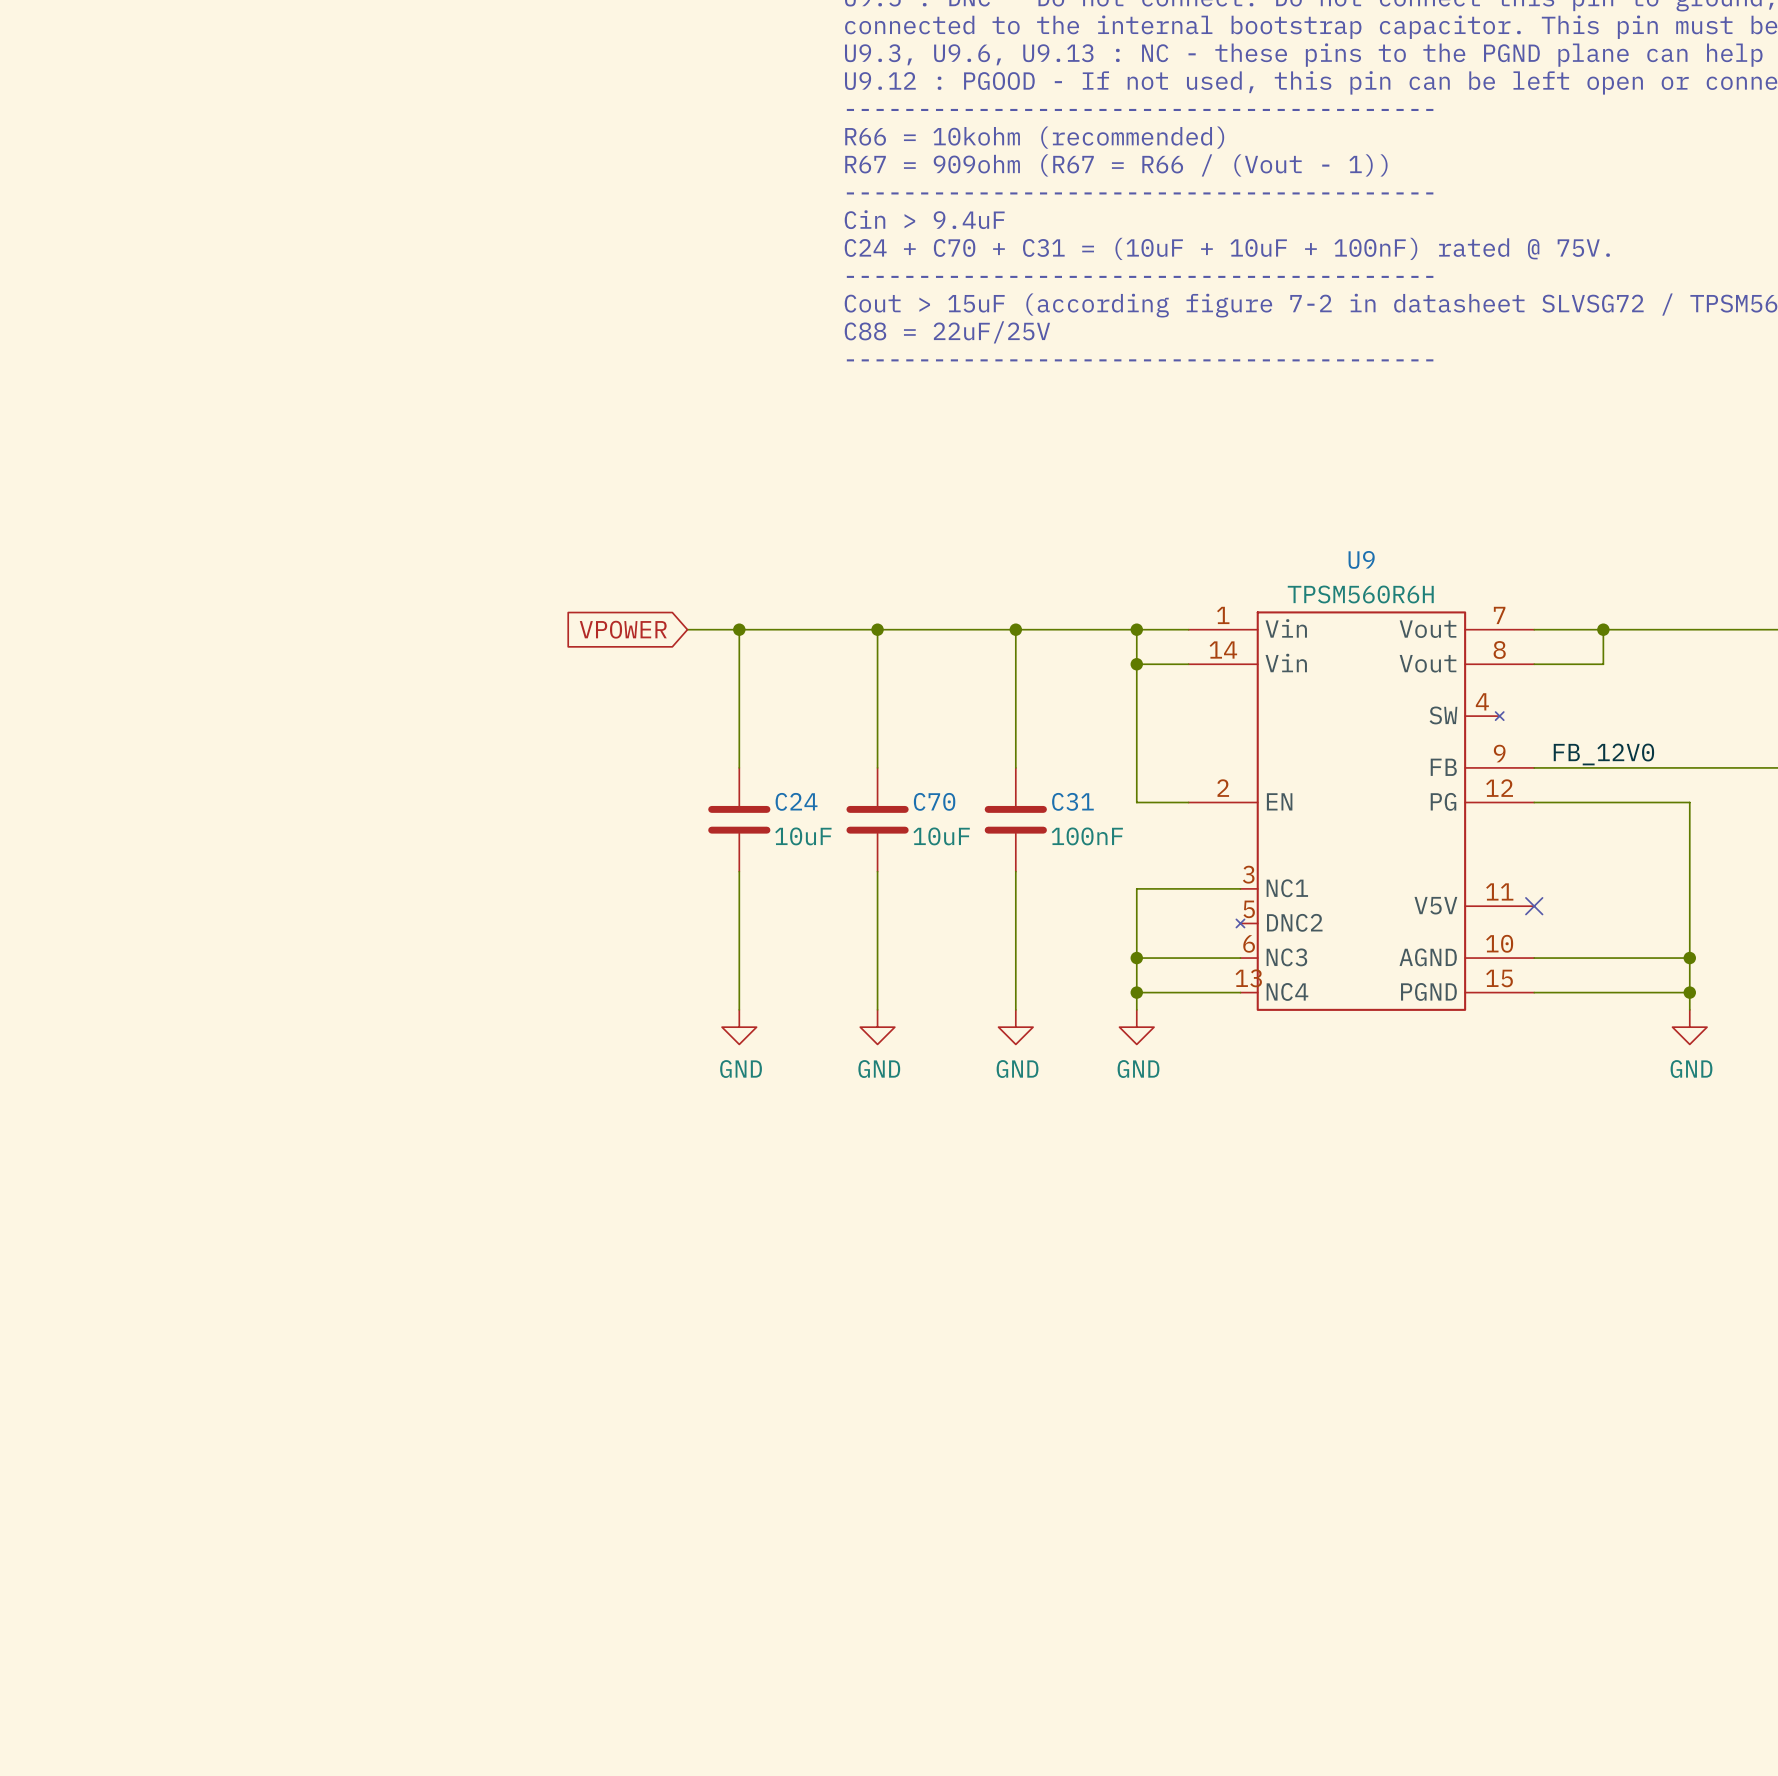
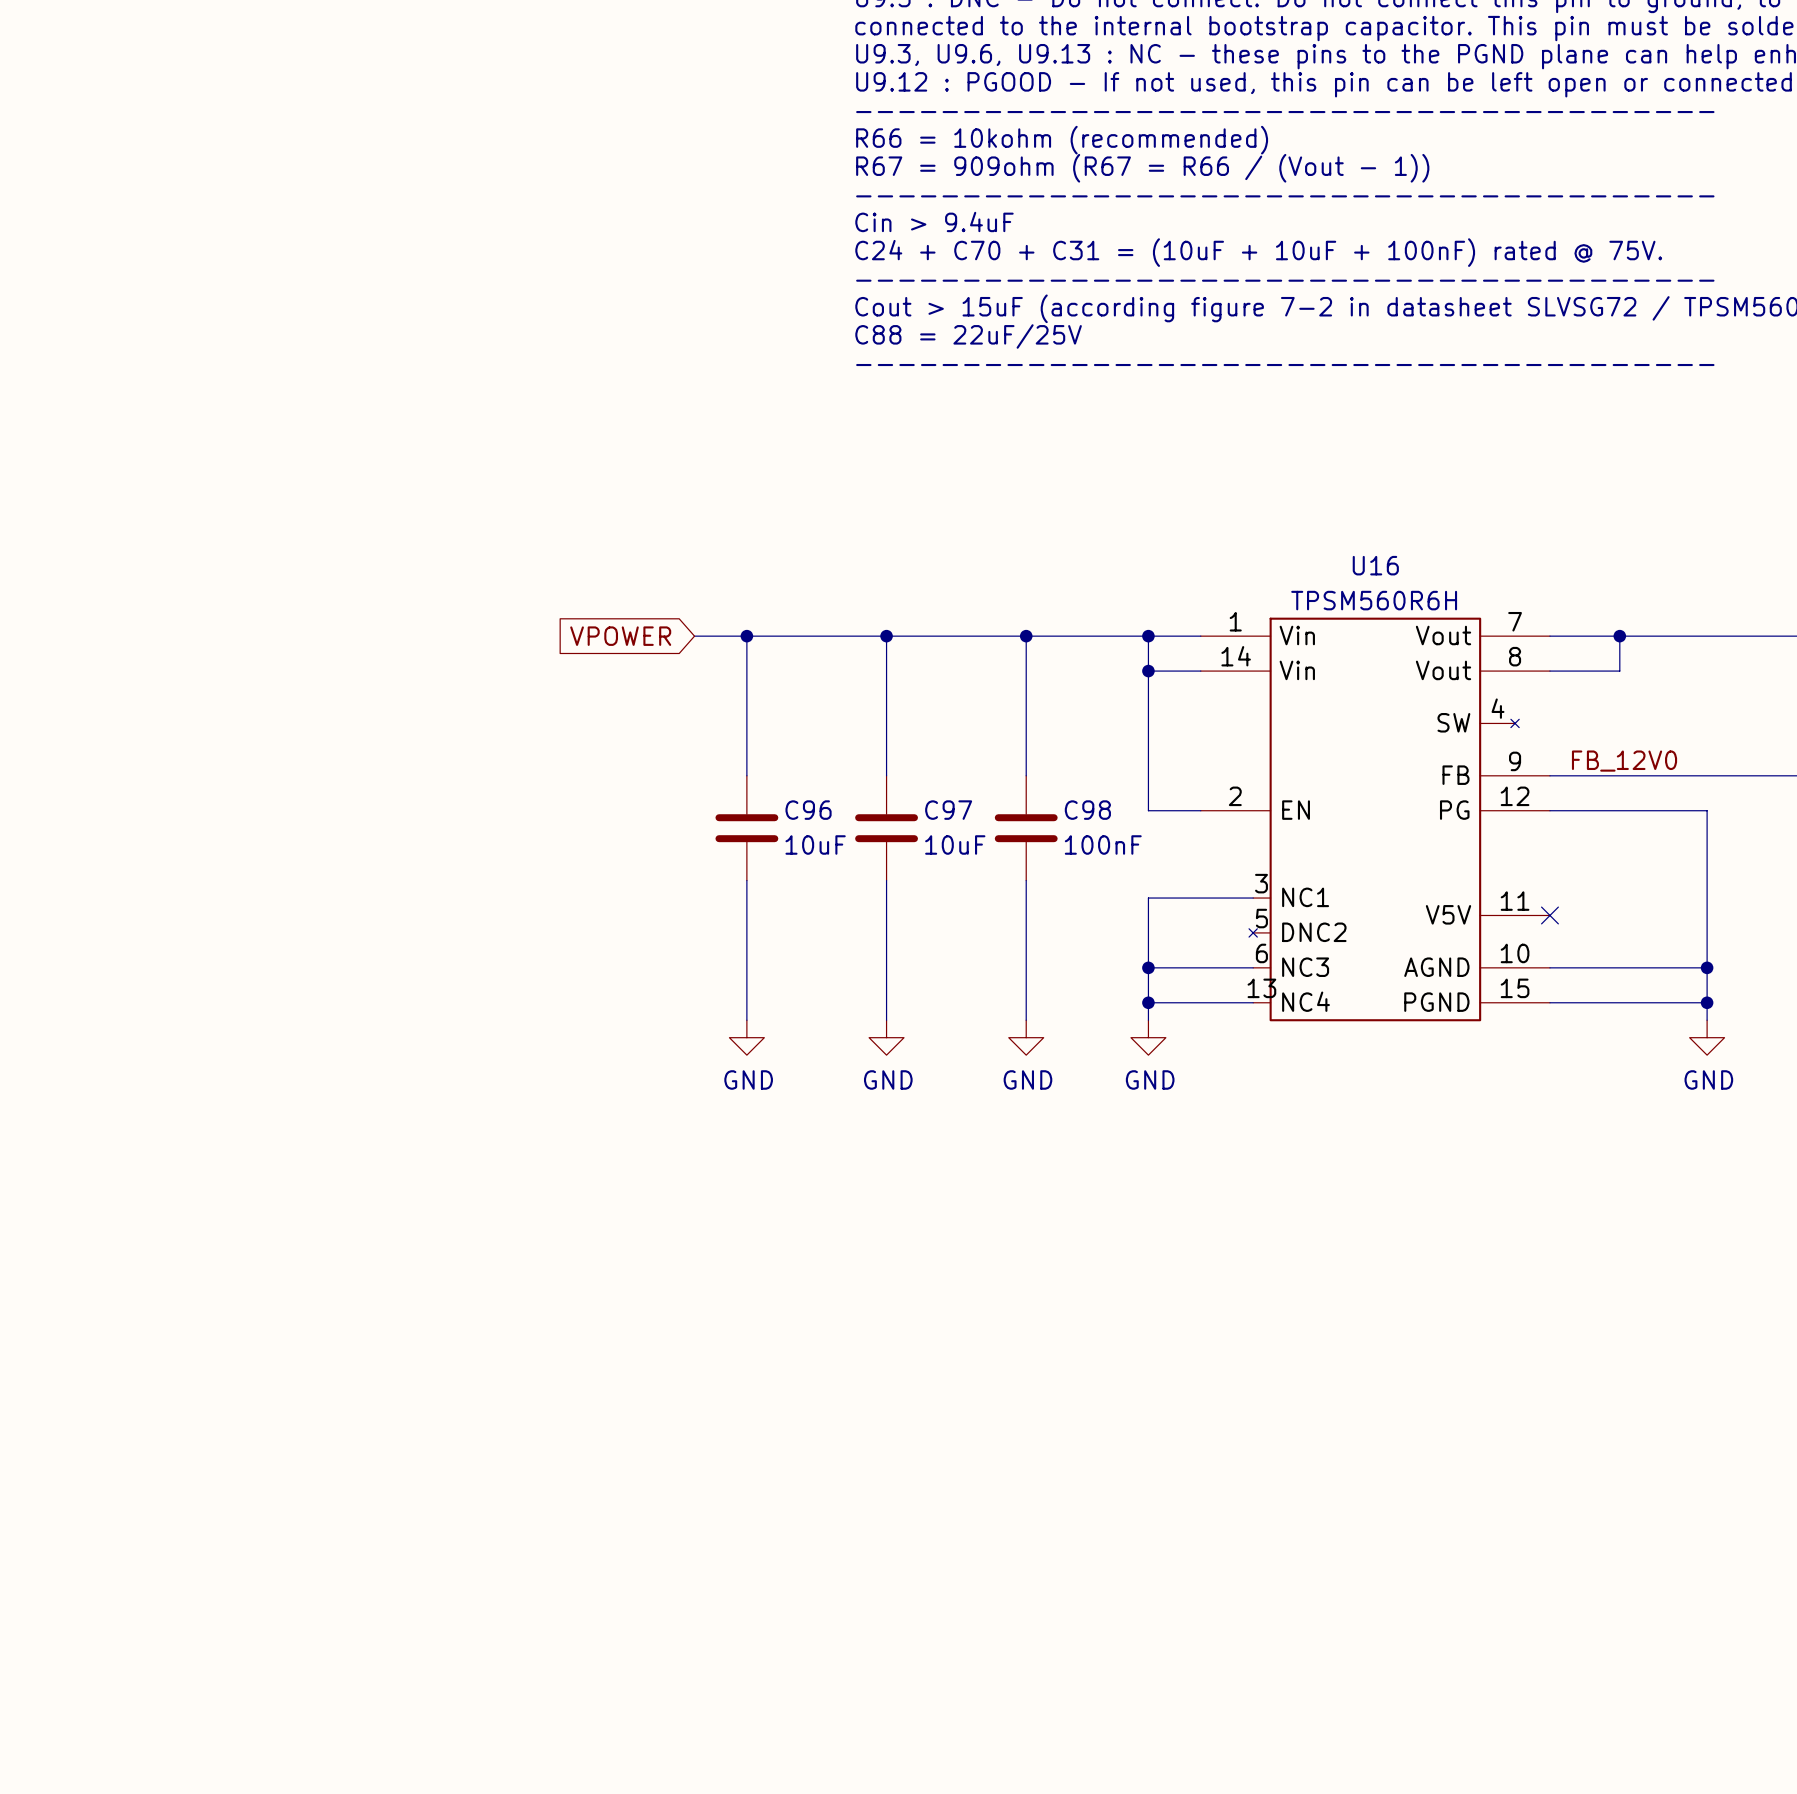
U9 name: U9 (1361, 559) -> U16 (1375, 565)
C24 name: C24 (796, 801) -> C96 (808, 810)
C70 name: C70 (934, 801) -> C97 (948, 810)
C31 name: C31 (1072, 801) -> C98 (1087, 810)

